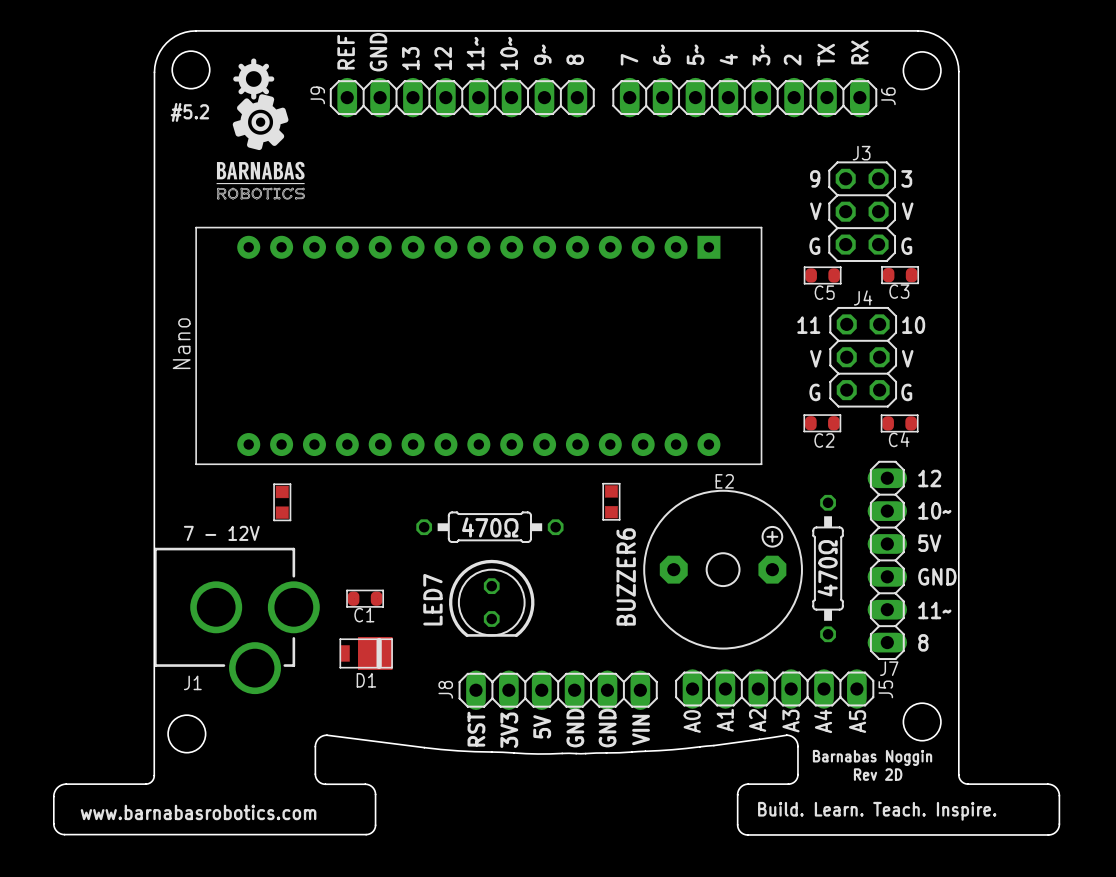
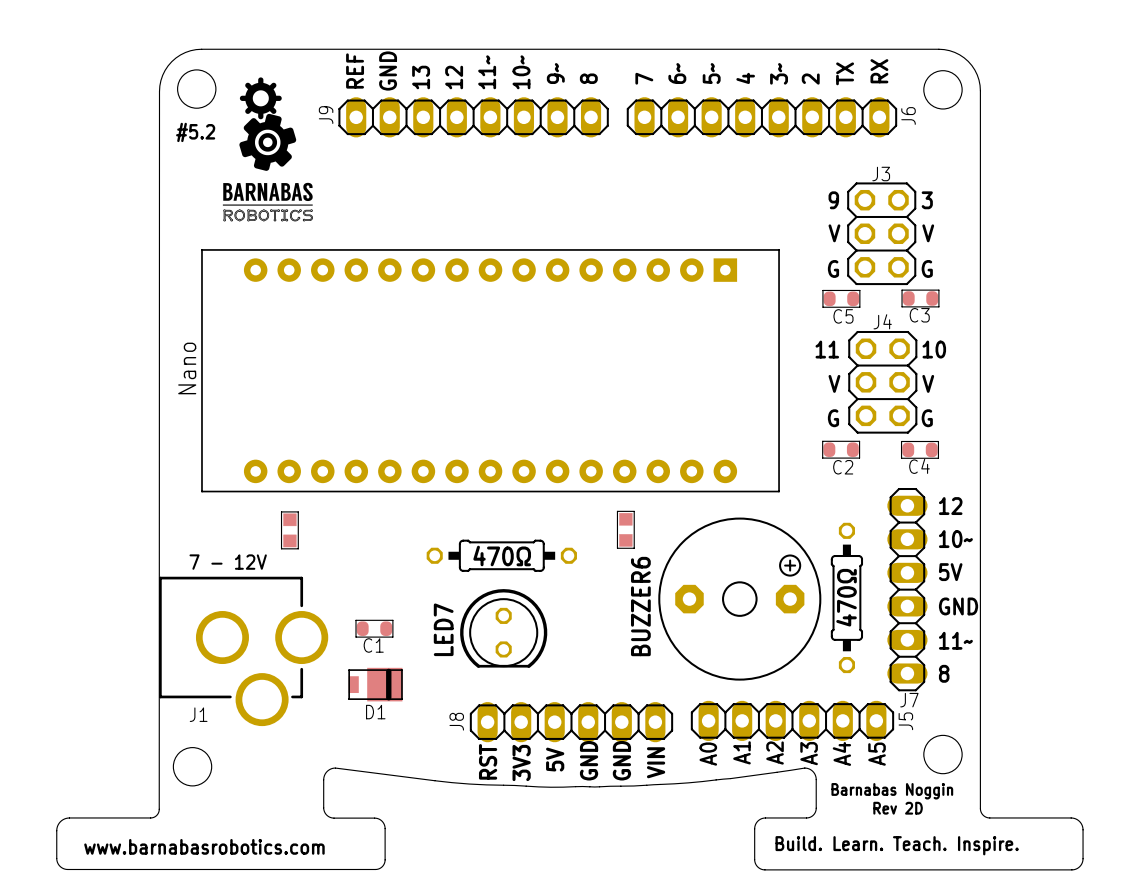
E2 name: E2 (724, 481) -> none

